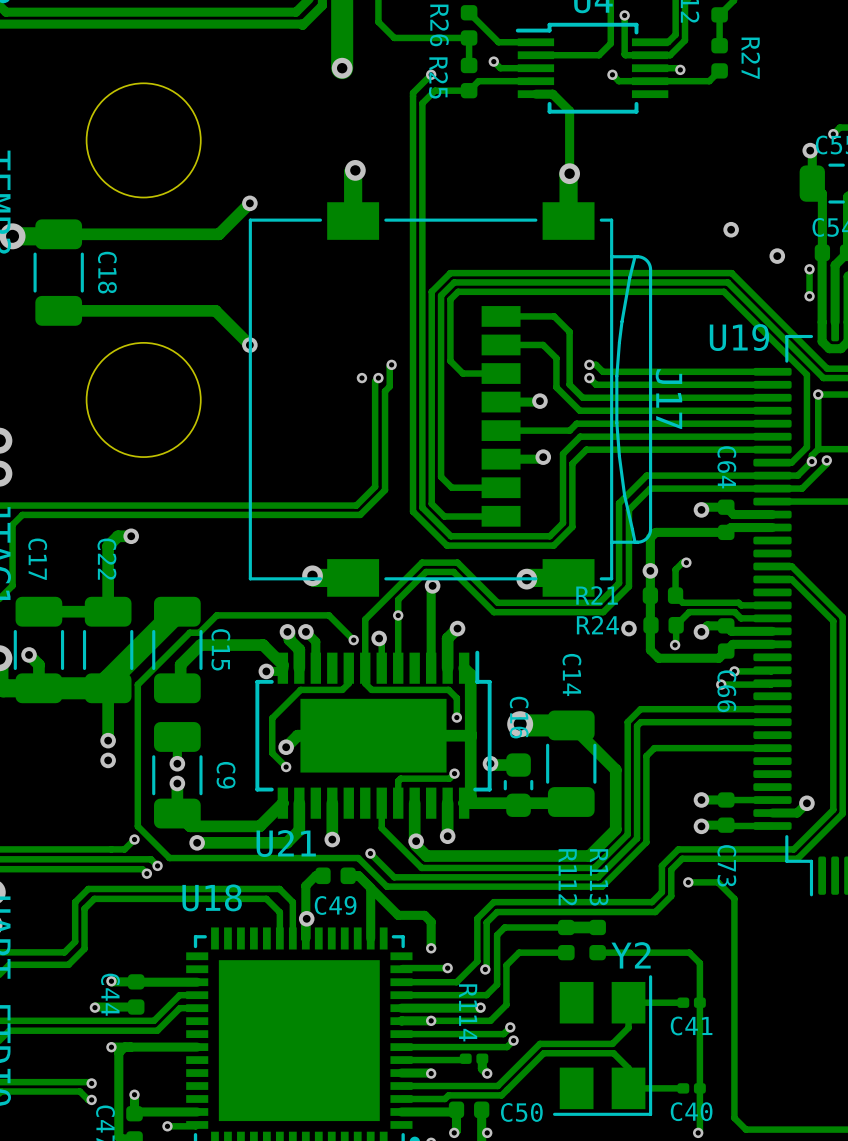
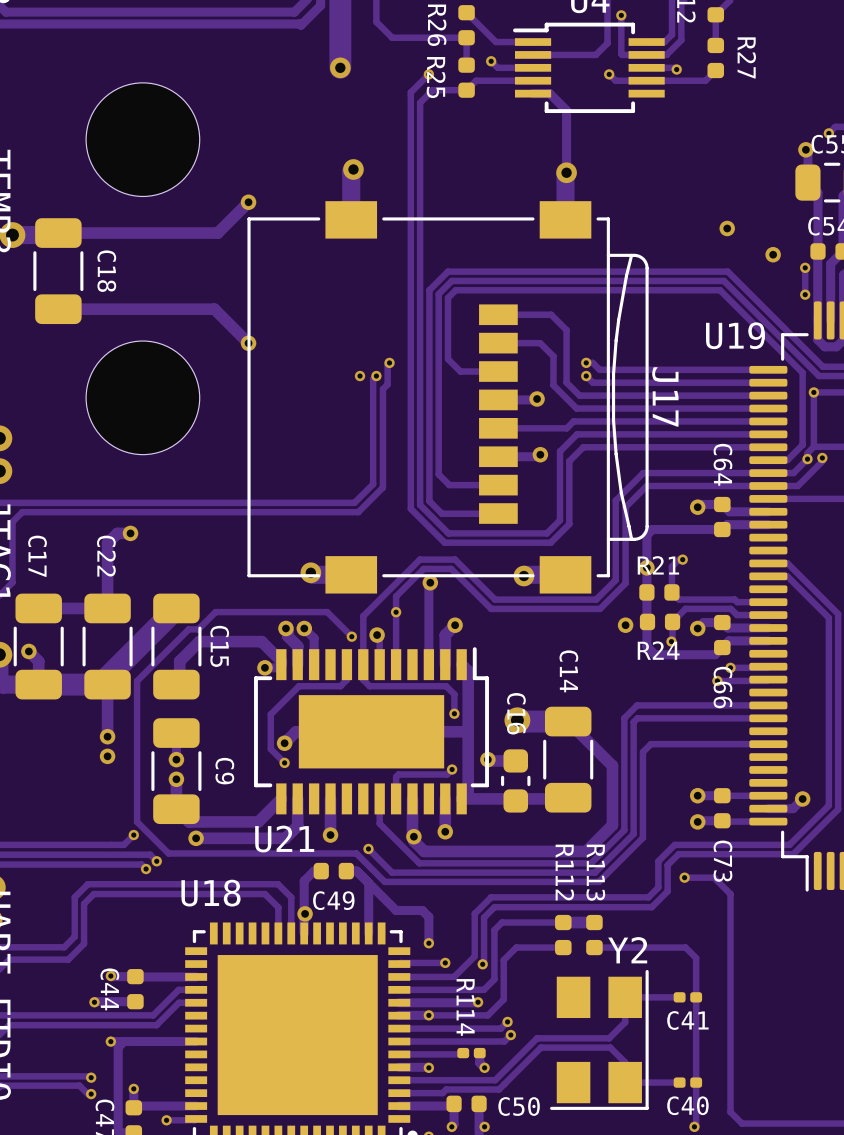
R21 name position: R21 (597, 595) -> R21 (658, 565)
R24 name position: R24 (597, 625) -> R24 (658, 650)

